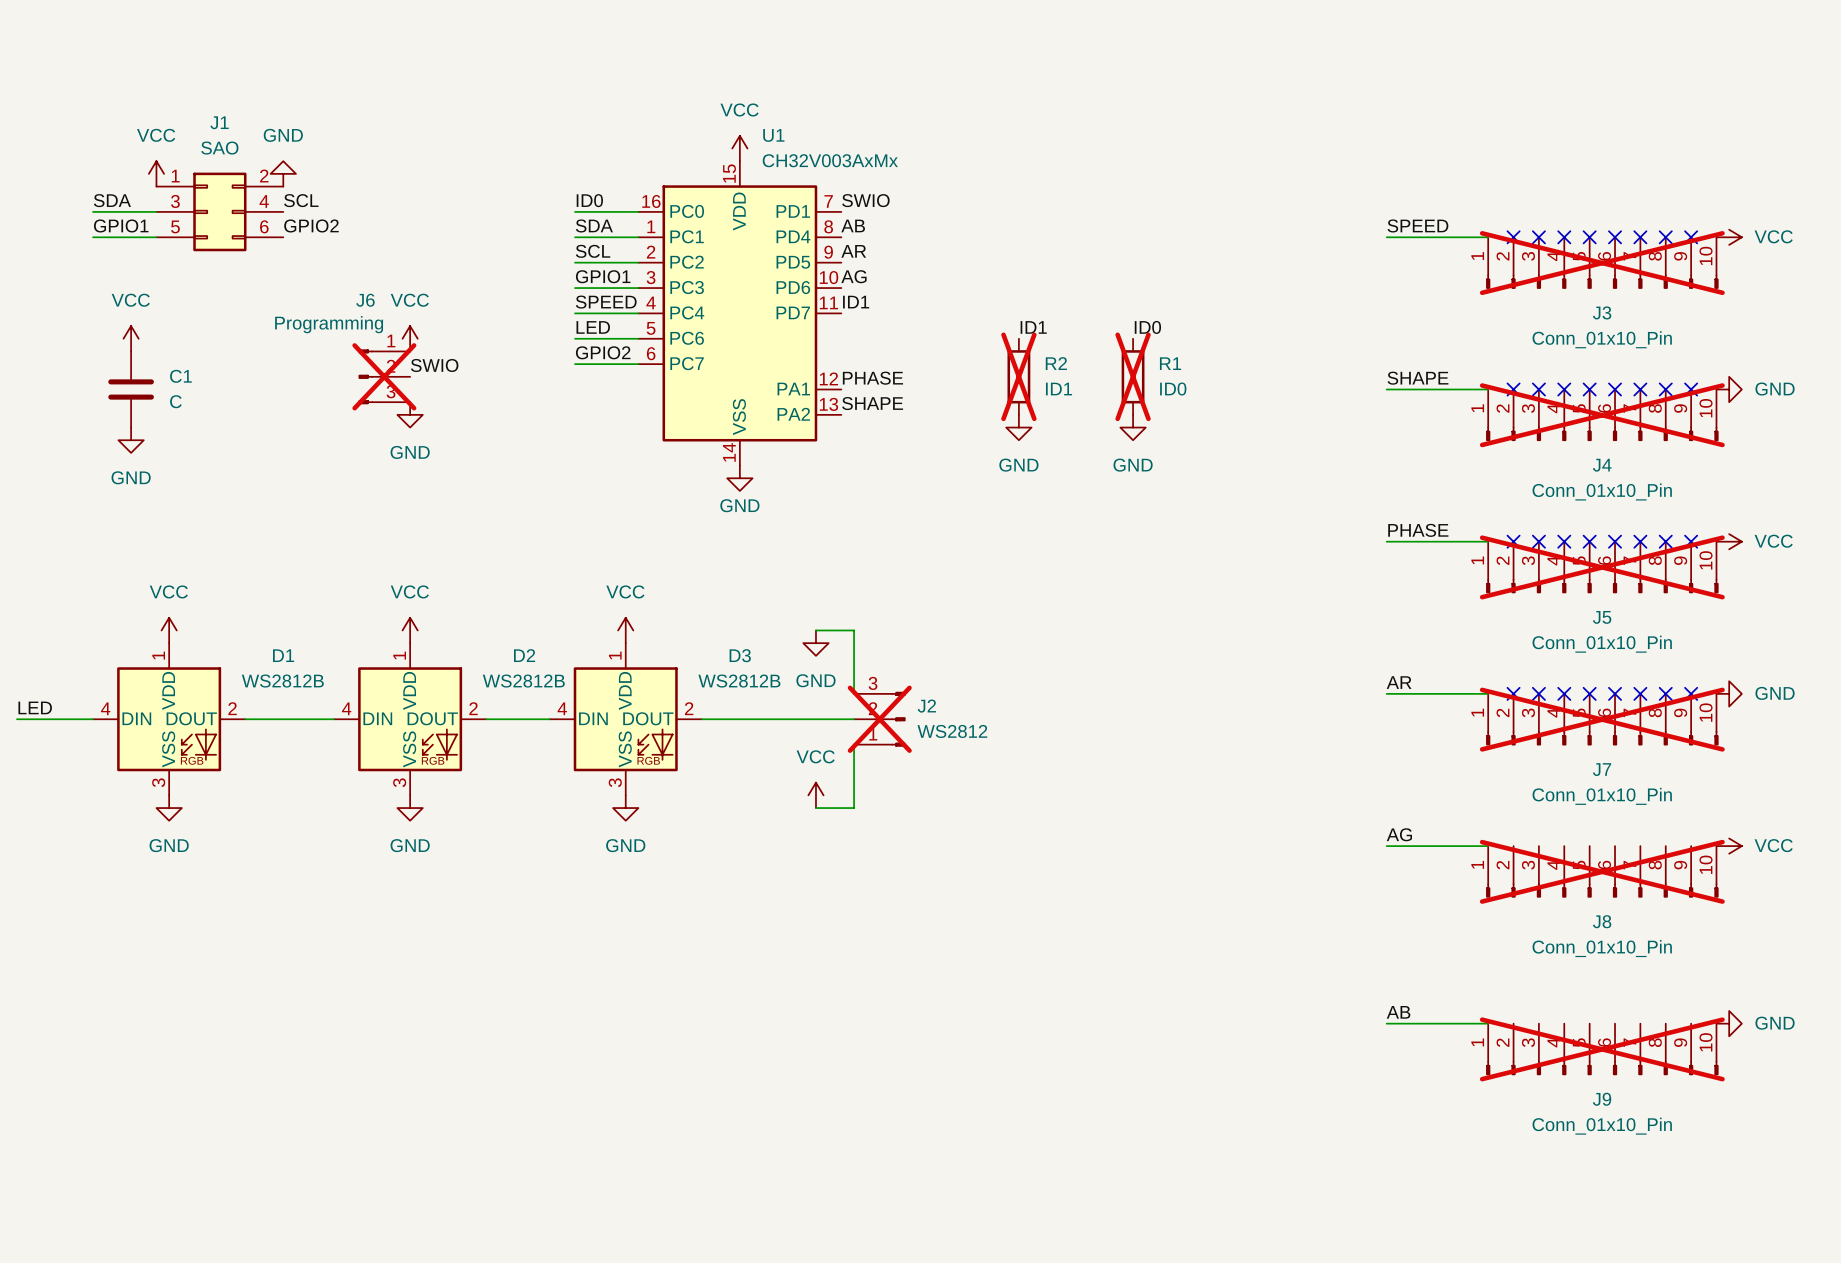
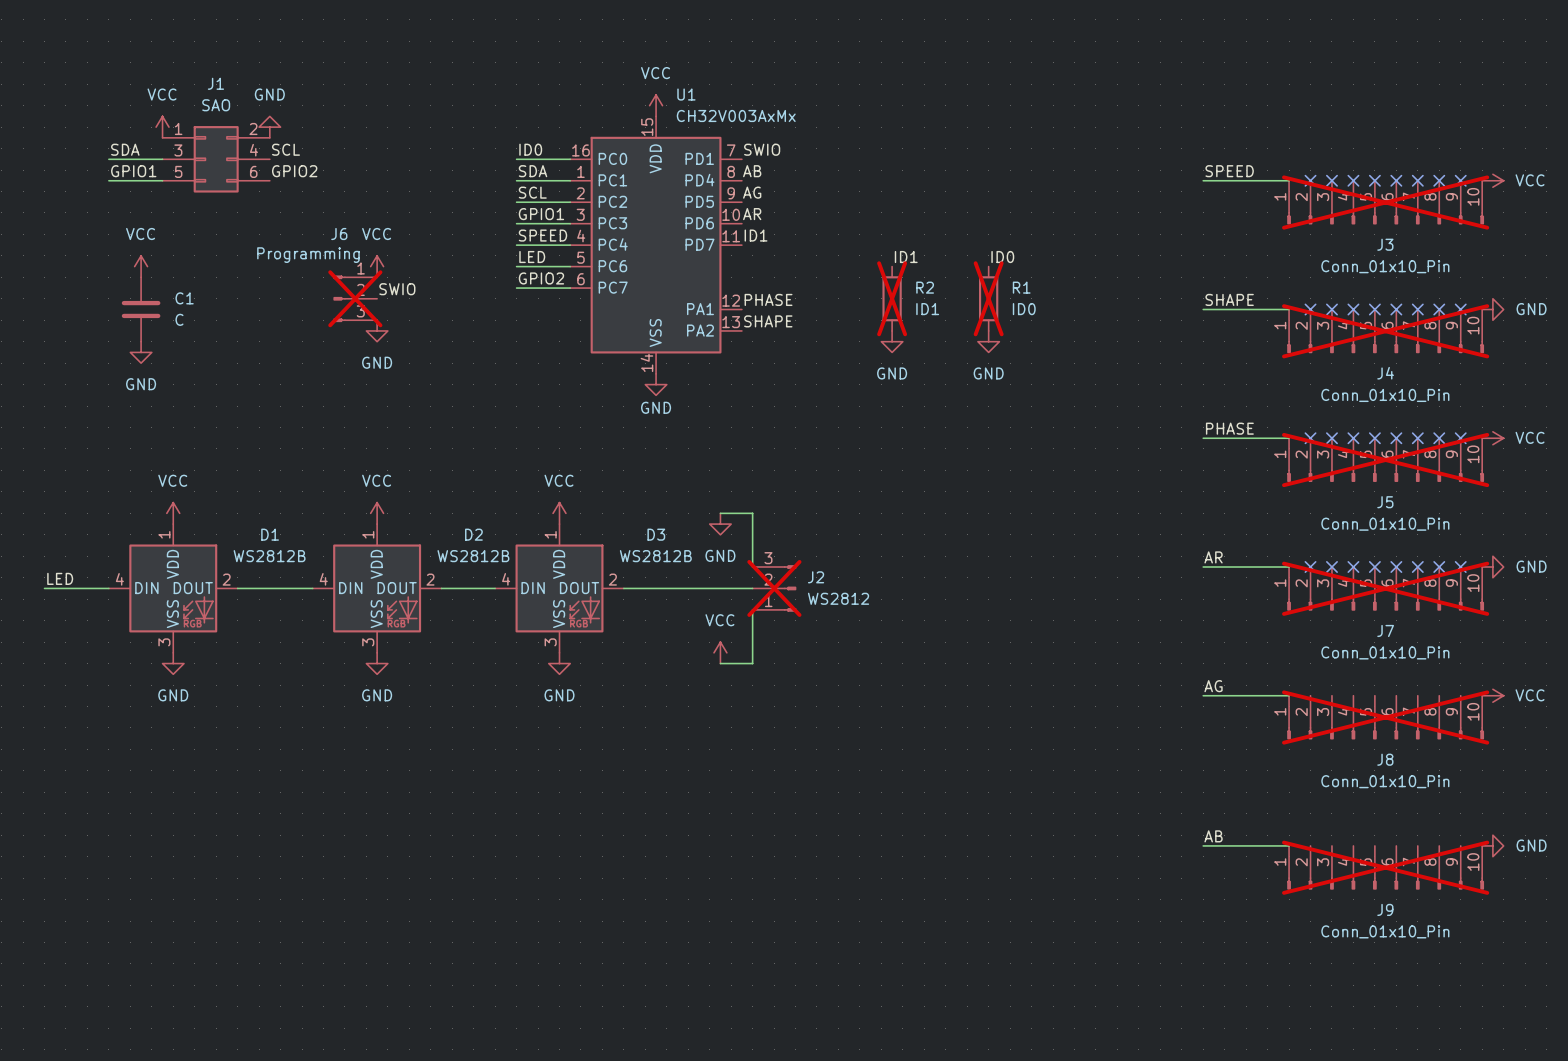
label: AR (853, 251) -> AG (752, 192)
label: AG (853, 276) -> AR (752, 214)

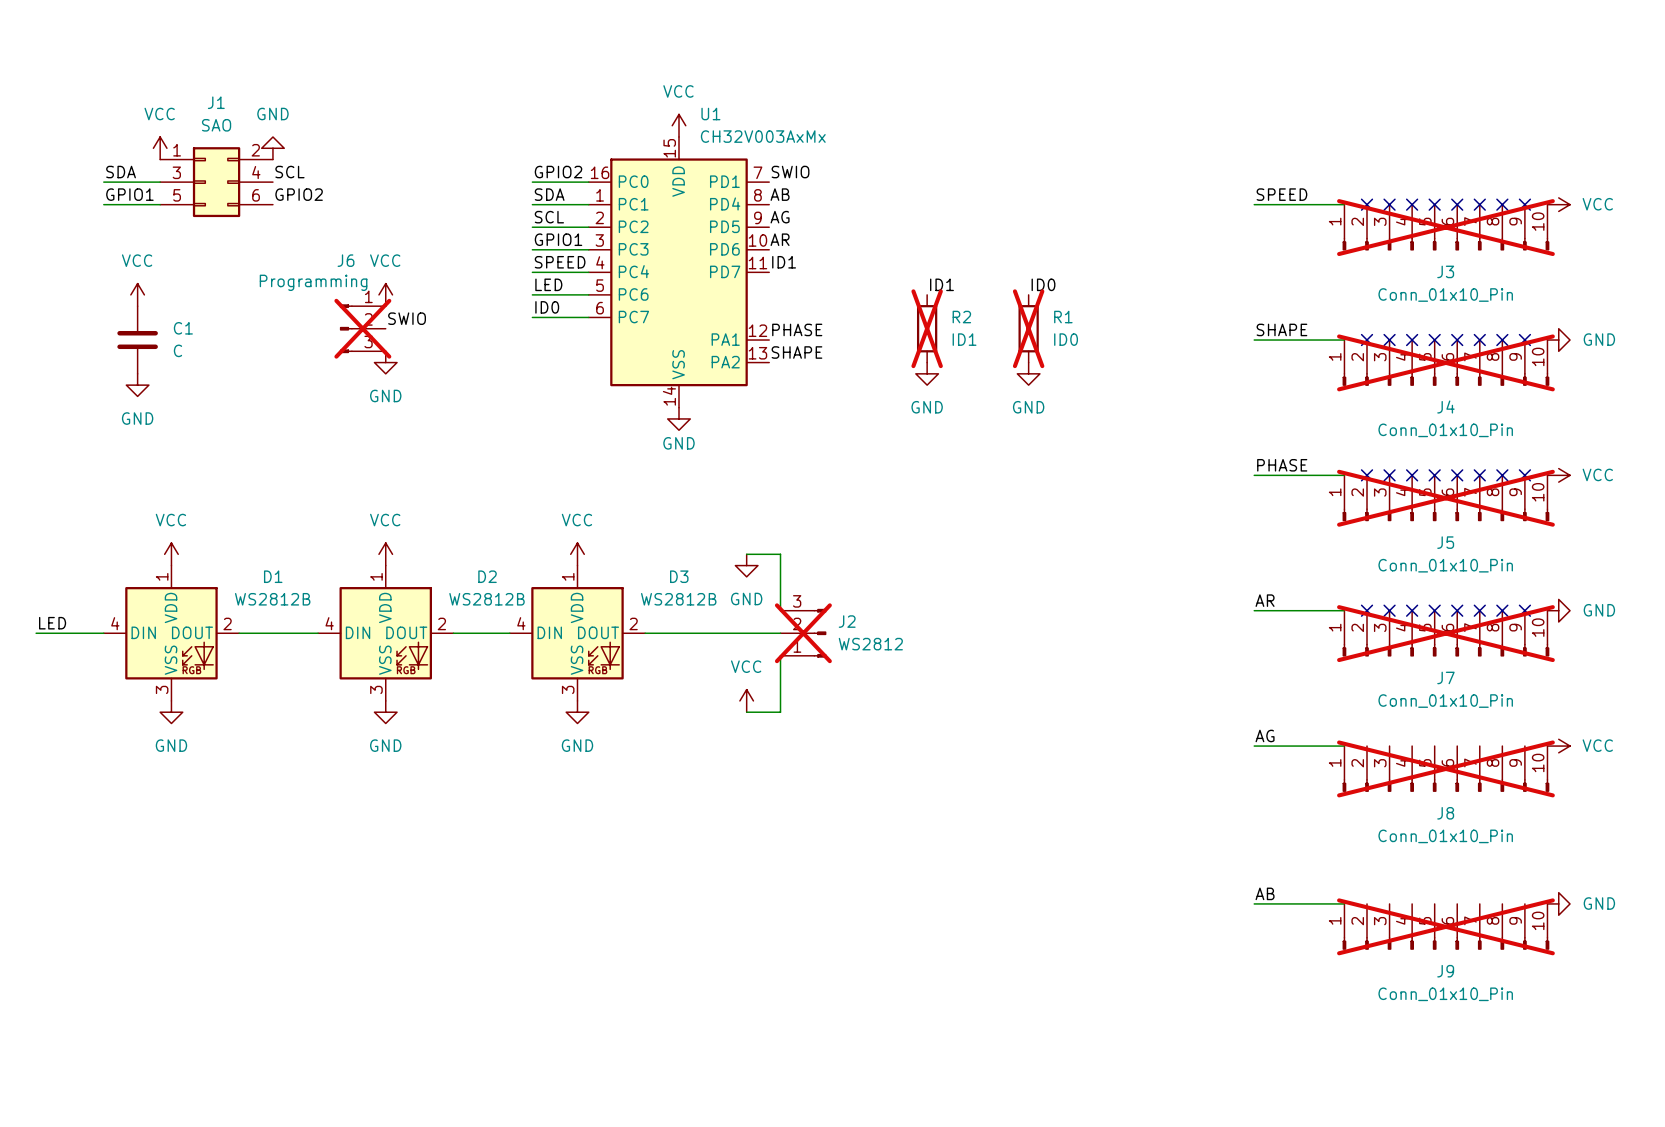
label: ID0 (530, 149) -> GPIO2 (558, 172)
label: GPIO2 (541, 278) -> ID0 (547, 307)

